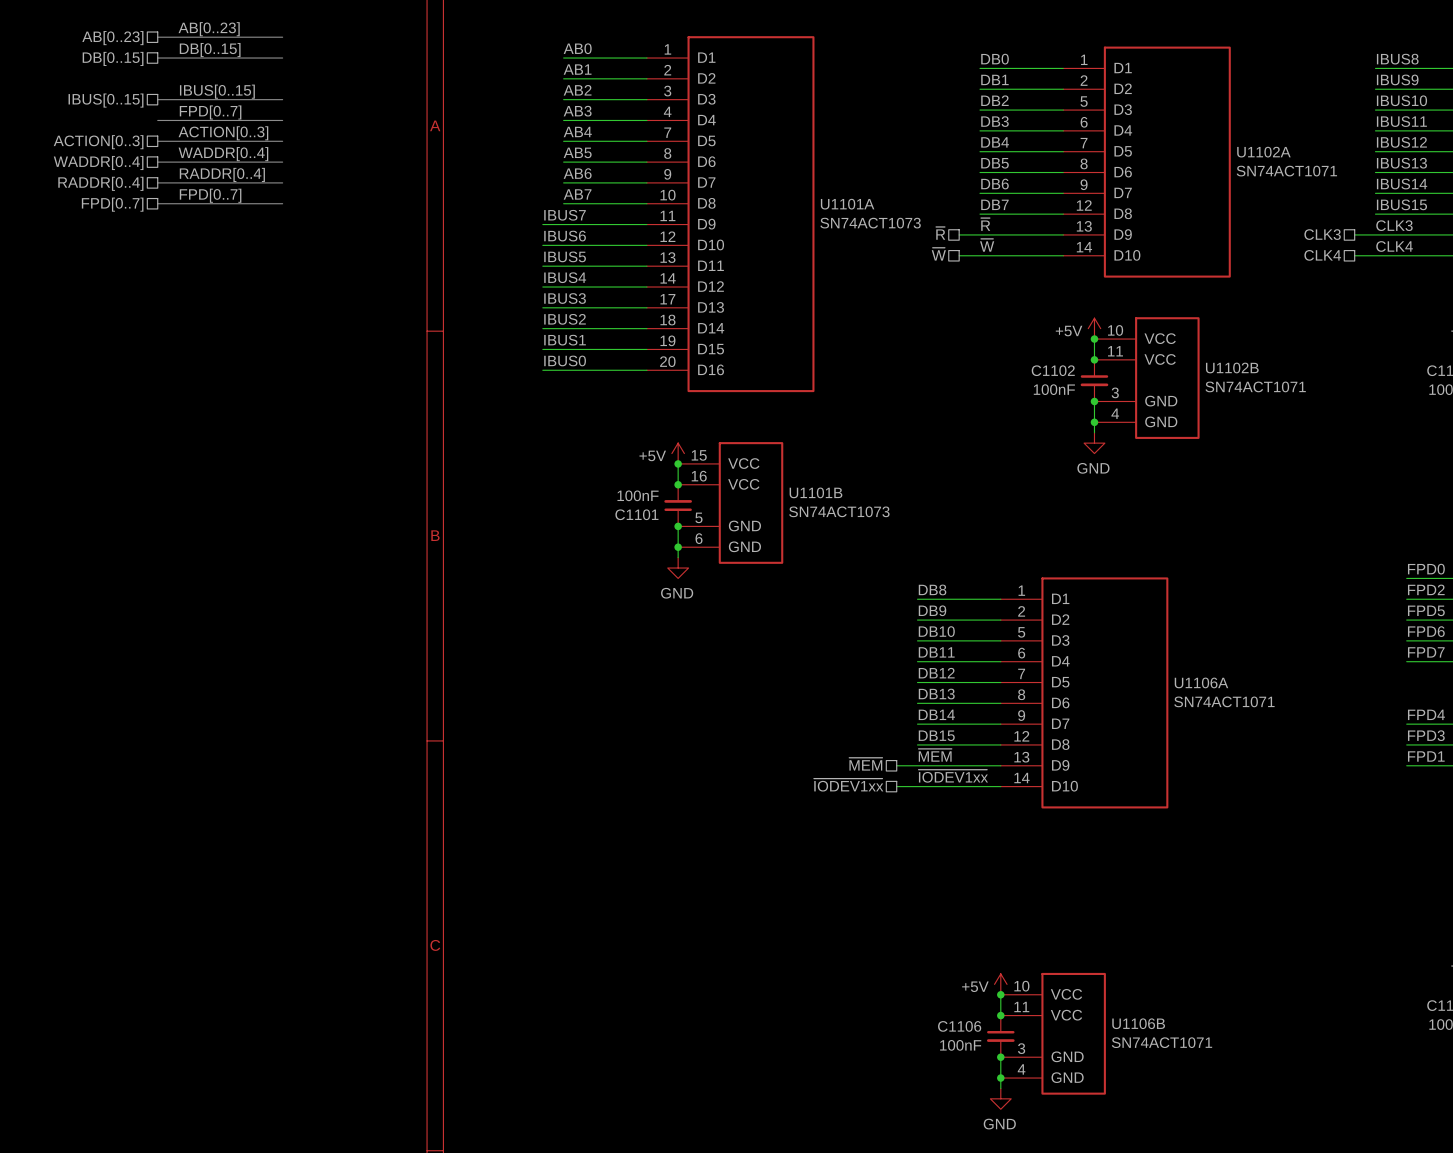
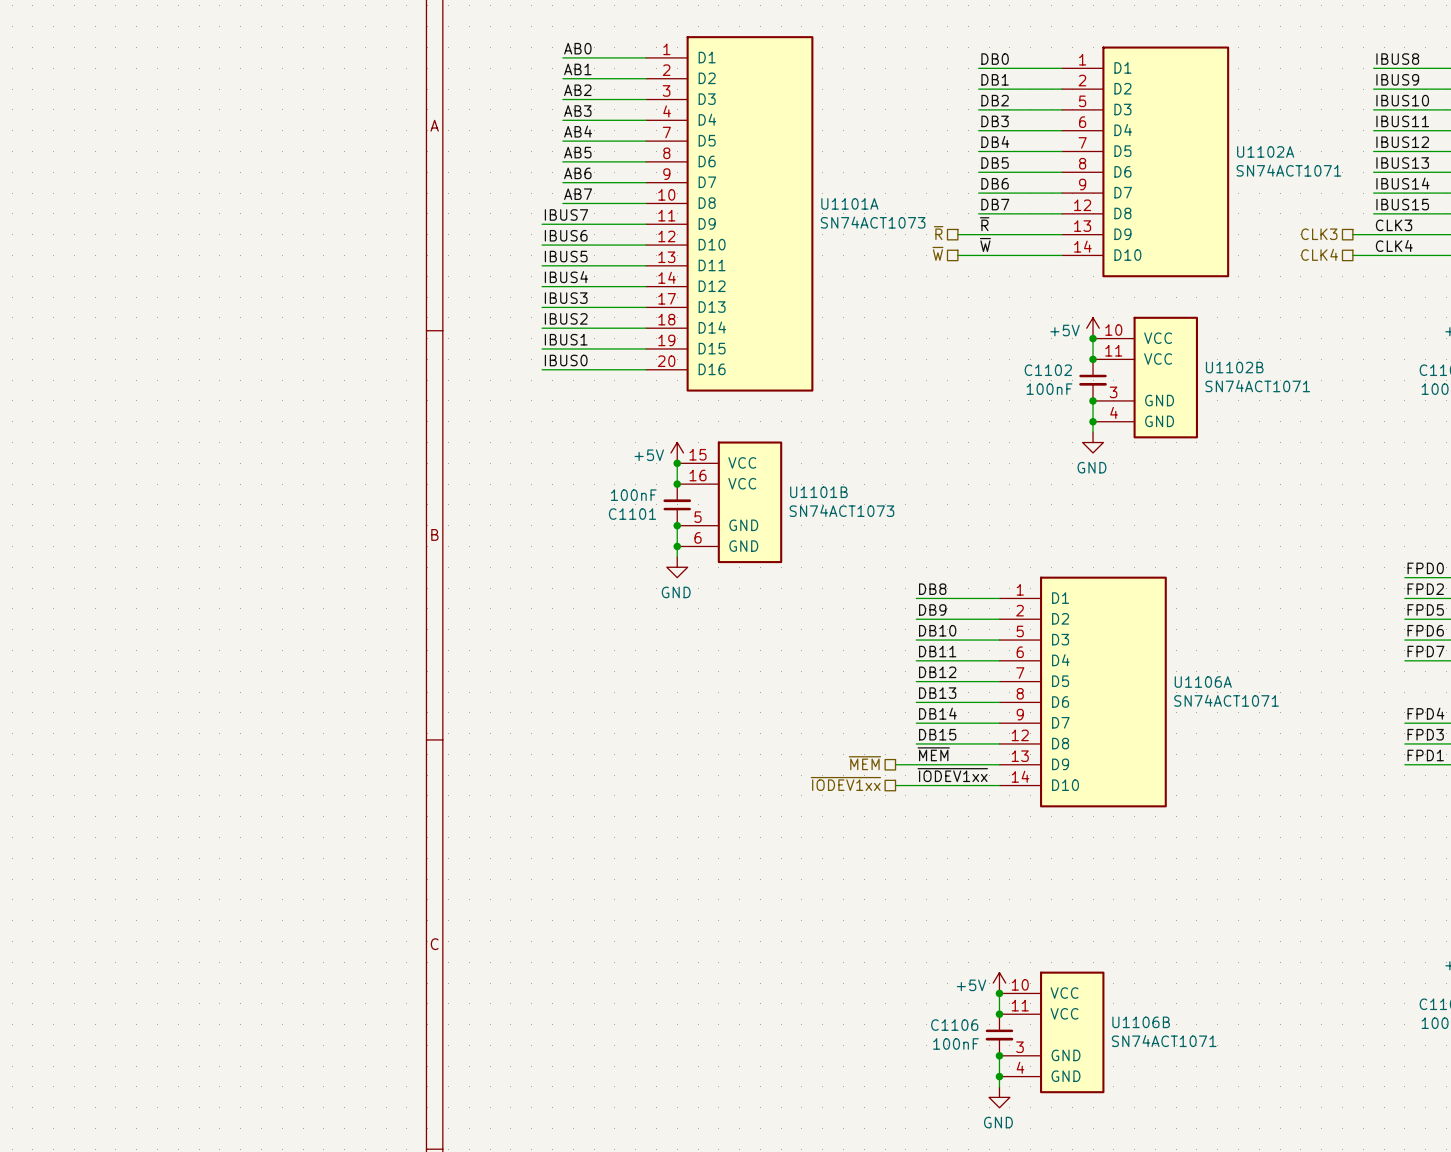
label: AB[0..23] (209, 29) -> none
bus: (157, 37) (282, 37) -> none
hierarchical label: AB[0..23] (112, 38) -> none
label: DB[0..15] (210, 50) -> none
hierarchical label: DB[0..15] (113, 58) -> none
bus: (157, 58) (282, 58) -> none
label: IBUS[0..15] (217, 91) -> none
bus: (157, 99) (282, 99) -> none
hierarchical label: IBUS[0..15] (105, 100) -> none
label: FPD[0..7] (210, 112) -> none
bus: (157, 120) (282, 120) -> none
label: ACTION[0..3] (223, 133) -> none
bus: (157, 141) (282, 141) -> none
hierarchical label: ACTION[0..3] (98, 142) -> none
label: WADDR[0..4] (223, 154) -> none
bus: (157, 162) (282, 162) -> none
hierarchical label: WADDR[0..4] (98, 163) -> none
label: RADDR[0..4] (222, 174) -> none
bus: (157, 182) (282, 182) -> none
hierarchical label: RADDR[0..4] (100, 183) -> none
label: FPD[0..7] (210, 195) -> none
bus: (157, 203) (282, 203) -> none
hierarchical label: FPD[0..7] (112, 204) -> none

